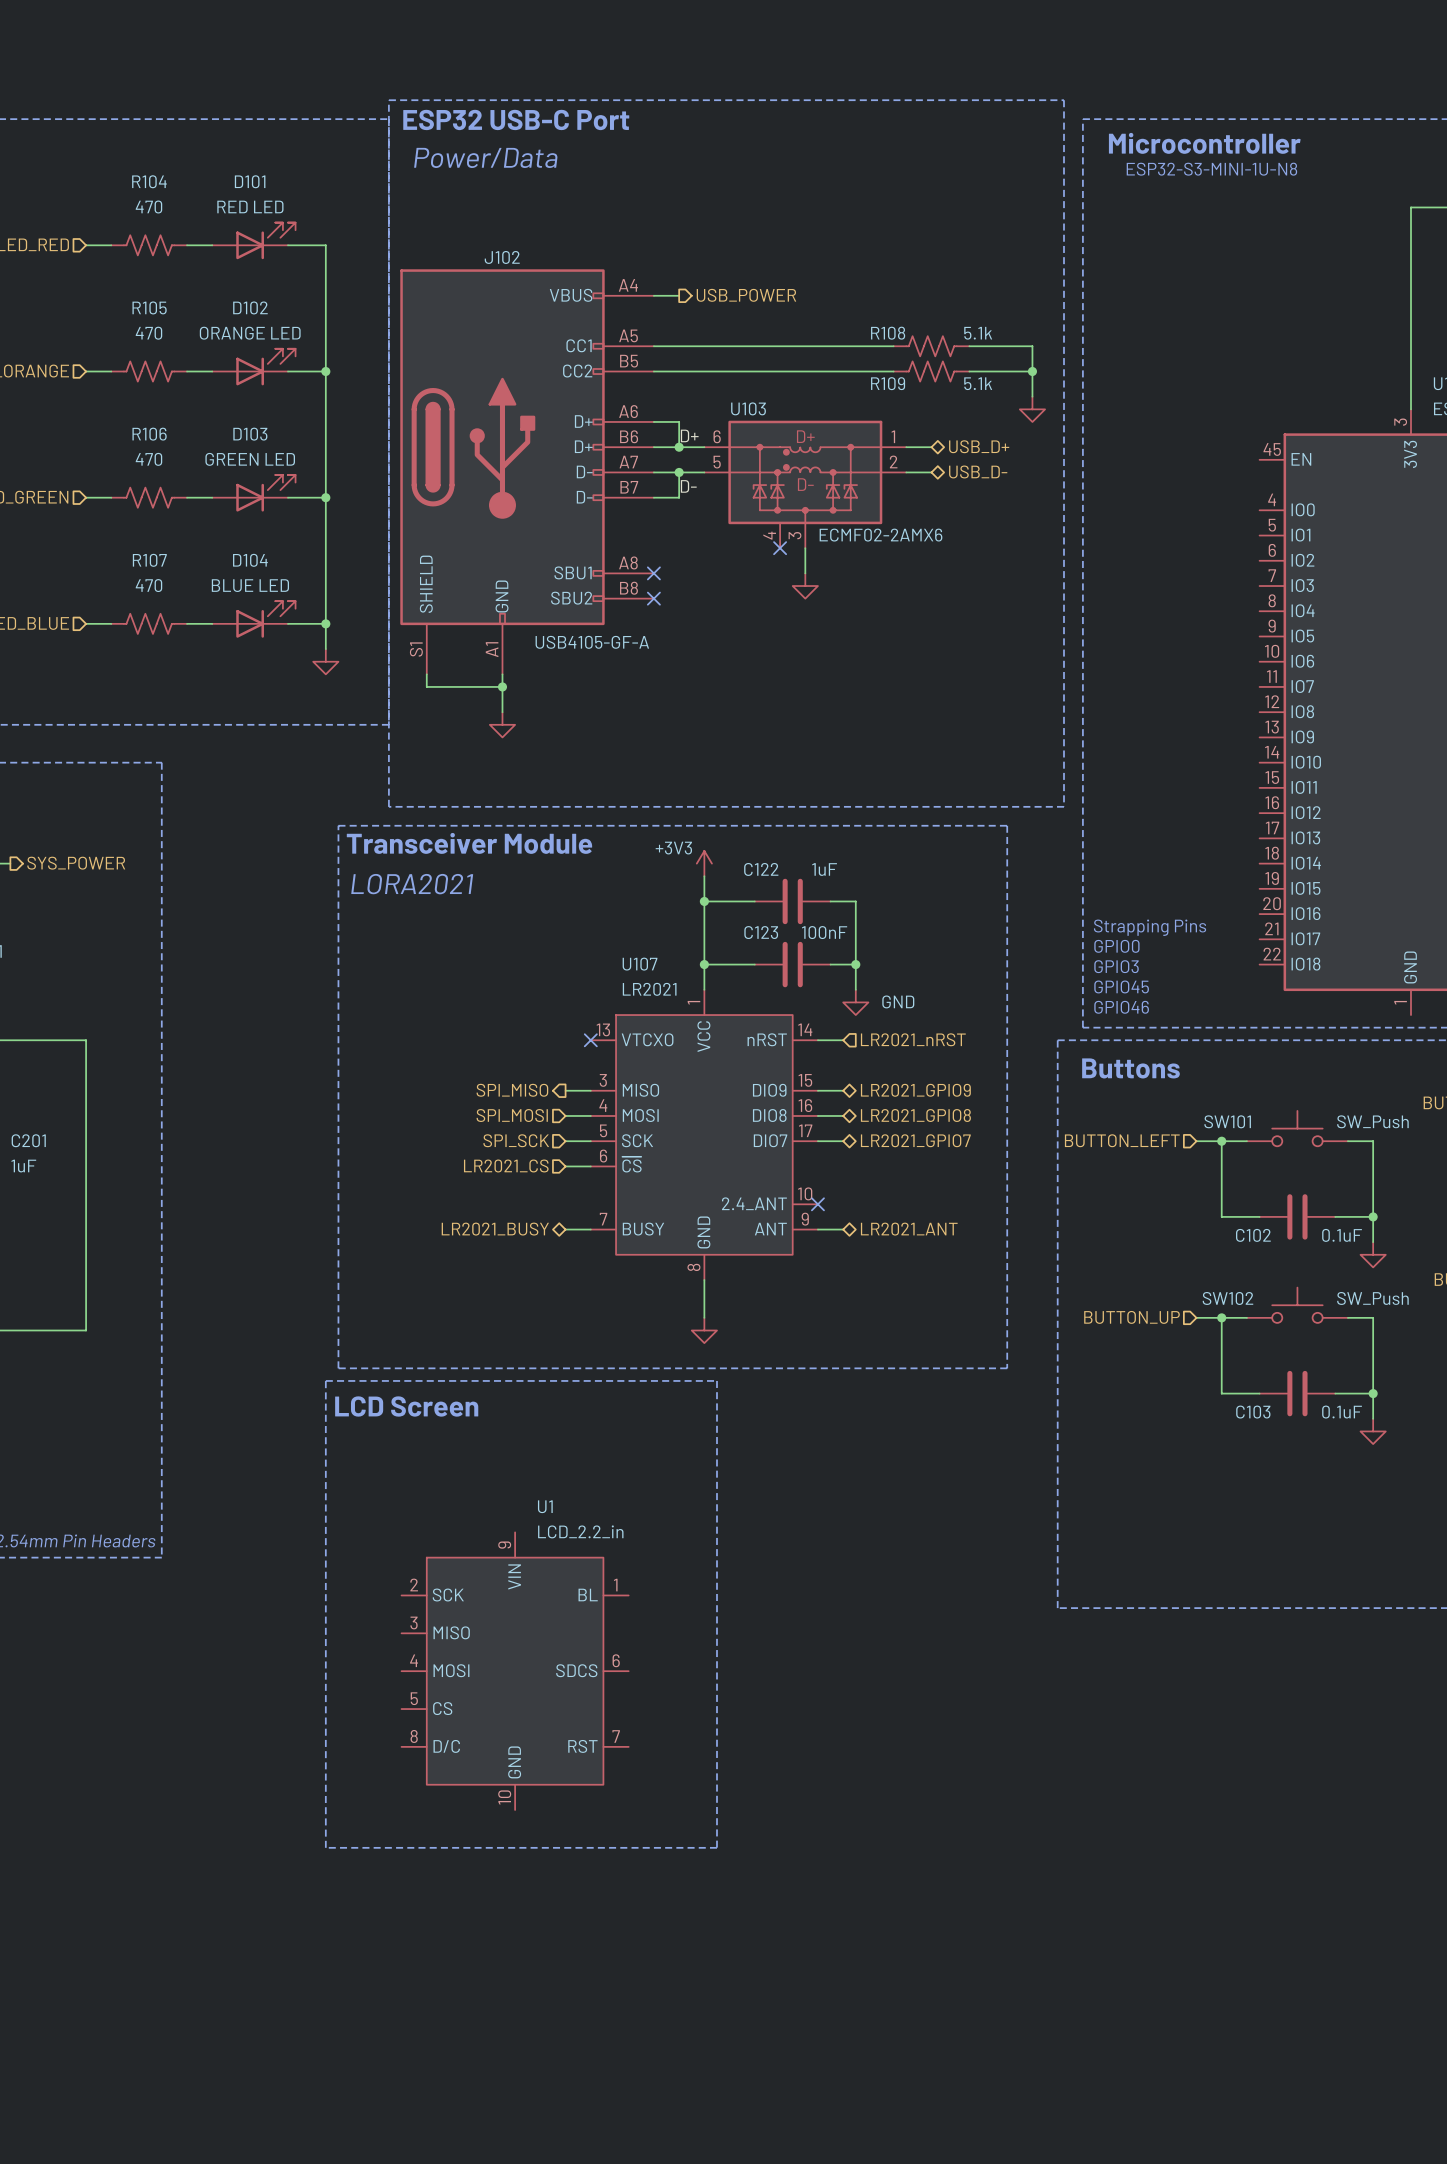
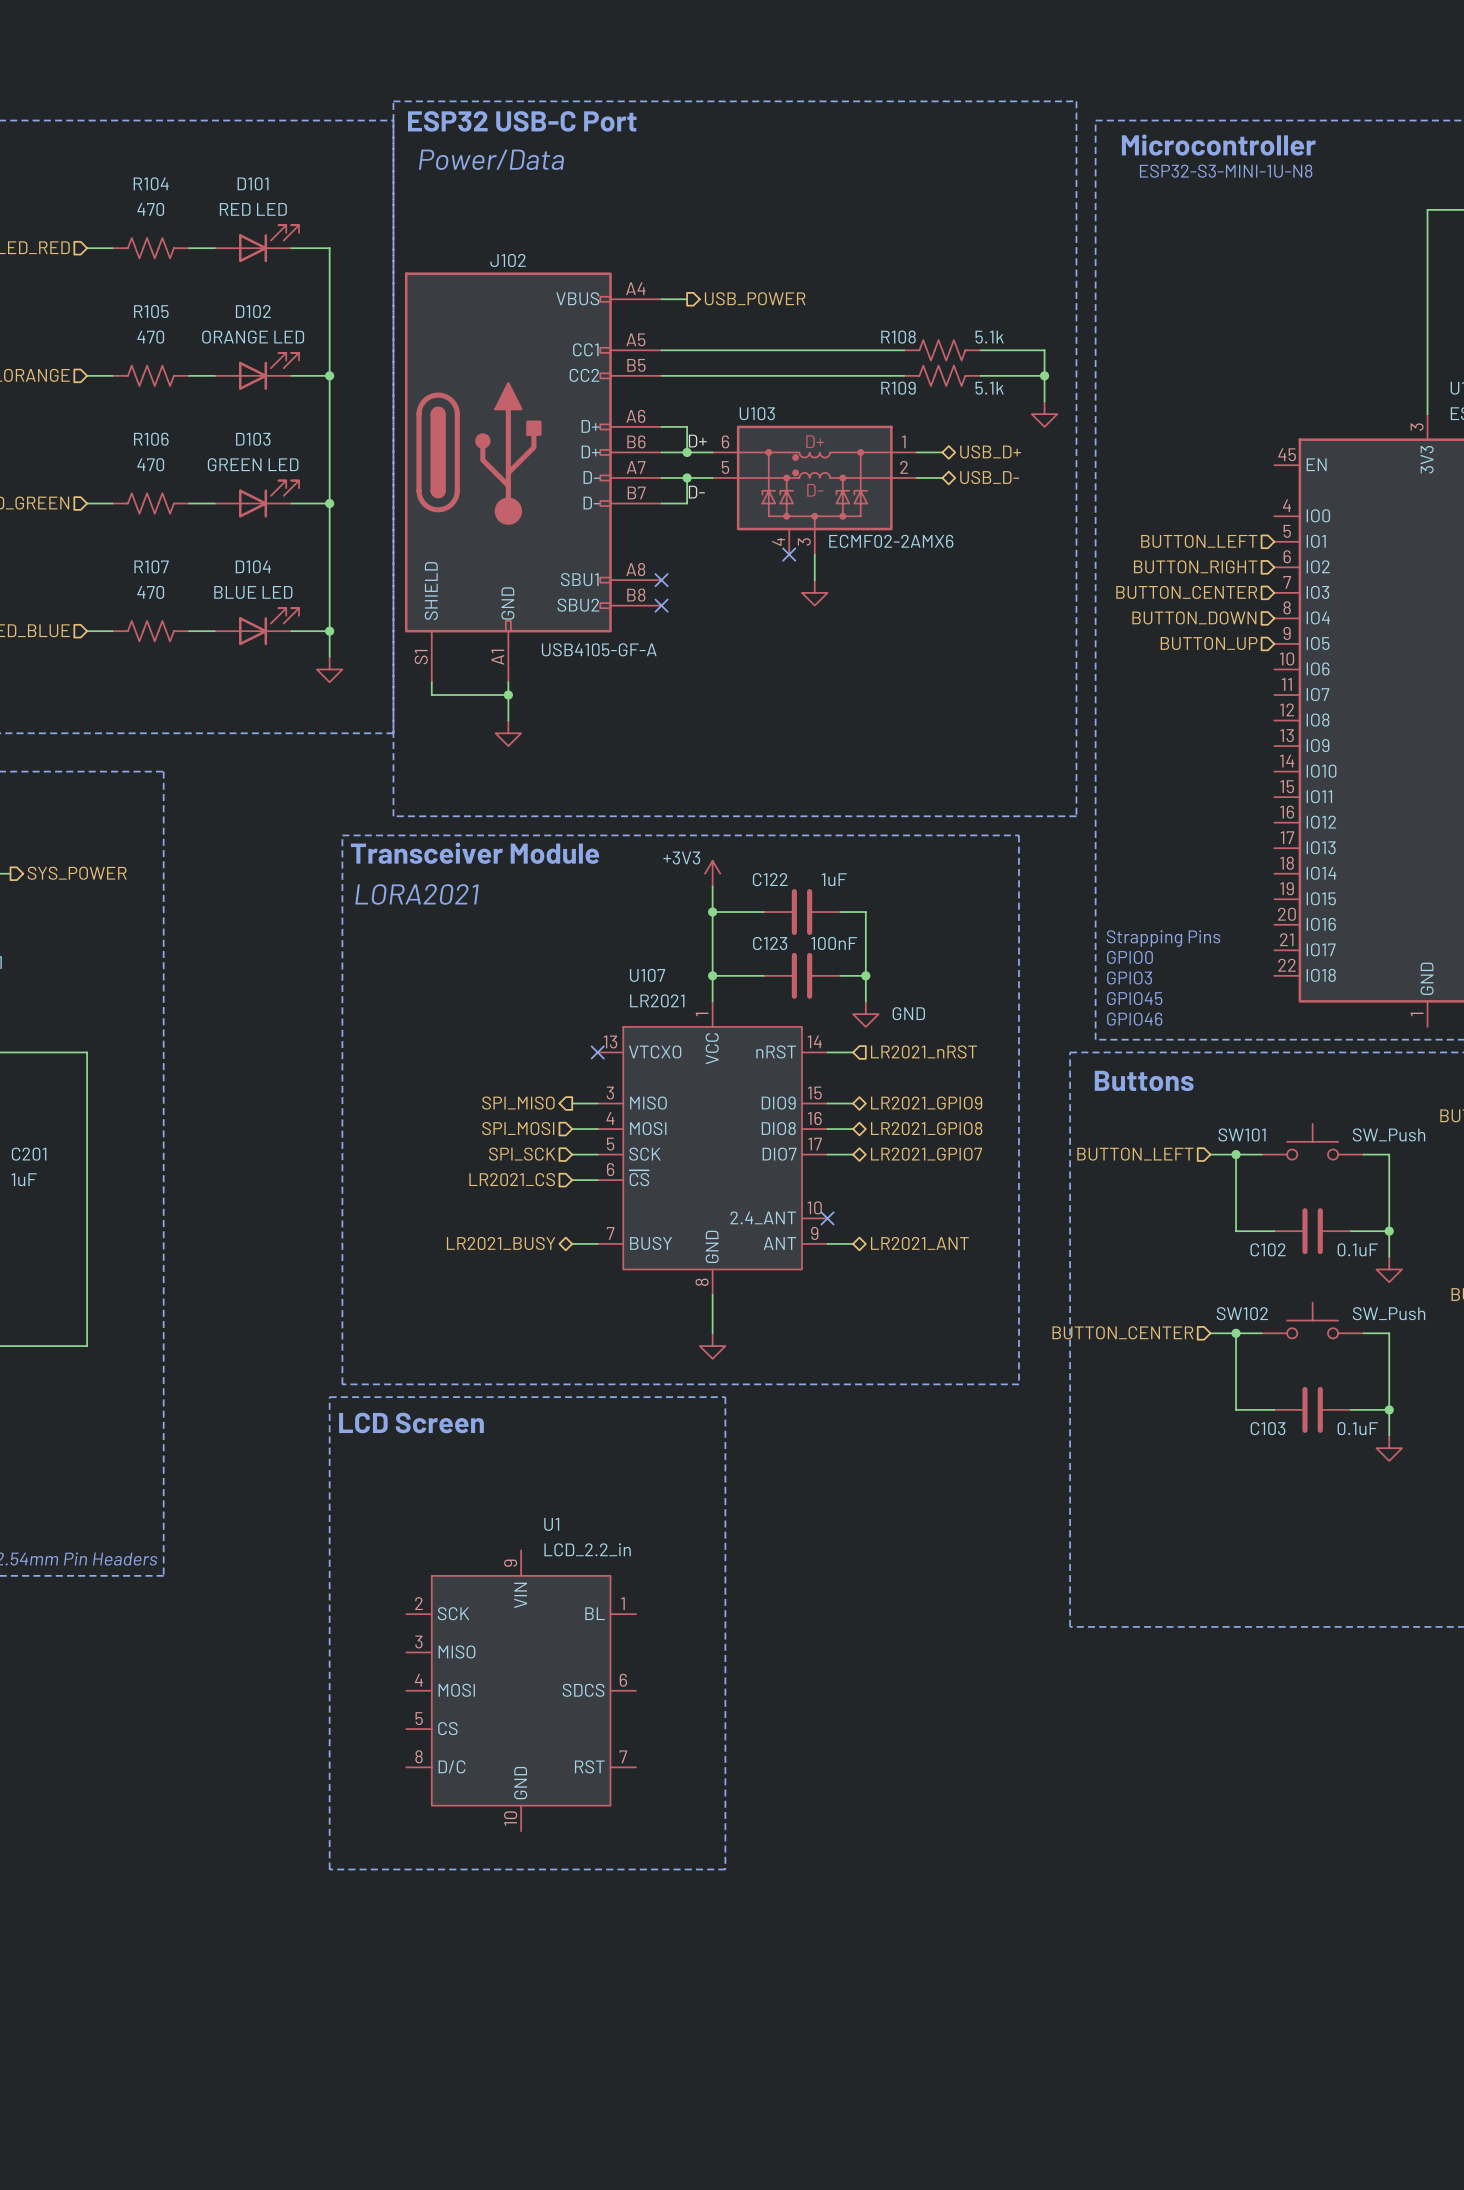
hierarchical label: none -> BUTTON_LEFT (1199, 541)
hierarchical label: none -> BUTTON_RIGHT (1195, 566)
hierarchical label: none -> BUTTON_CENTER (1186, 592)
hierarchical label: none -> BUTTON_DOWN (1194, 617)
hierarchical label: none -> BUTTON_UP (1209, 643)
hierarchical label: BUTTON_UP (1131, 1317) -> BUTTON_CENTER (1122, 1332)

